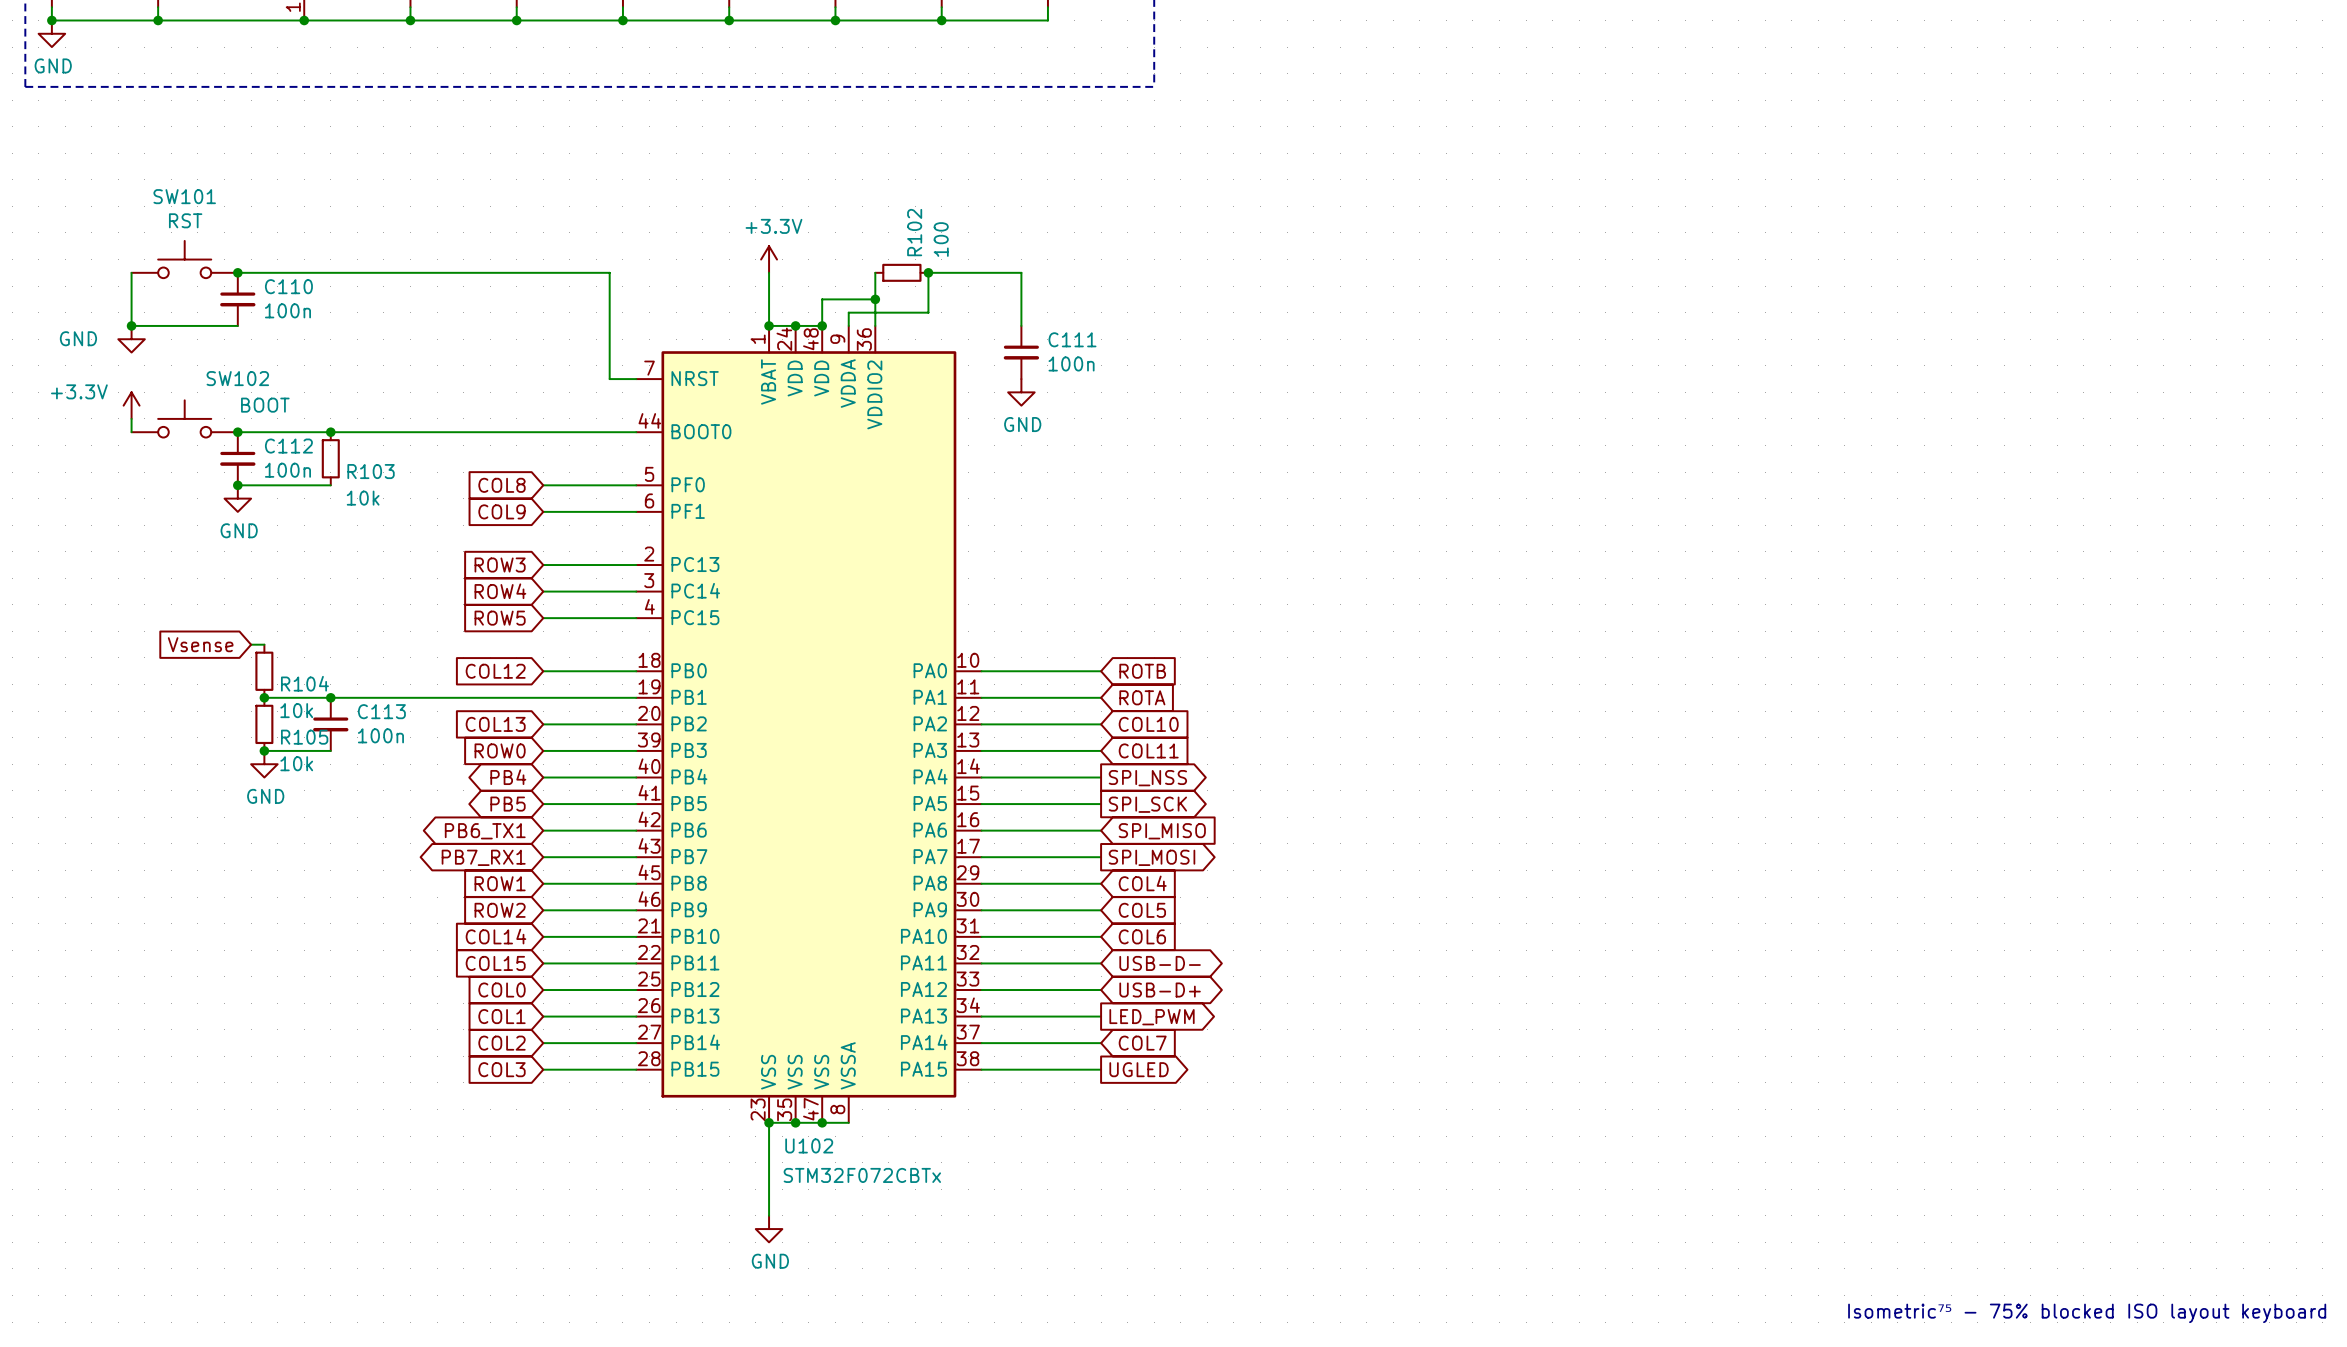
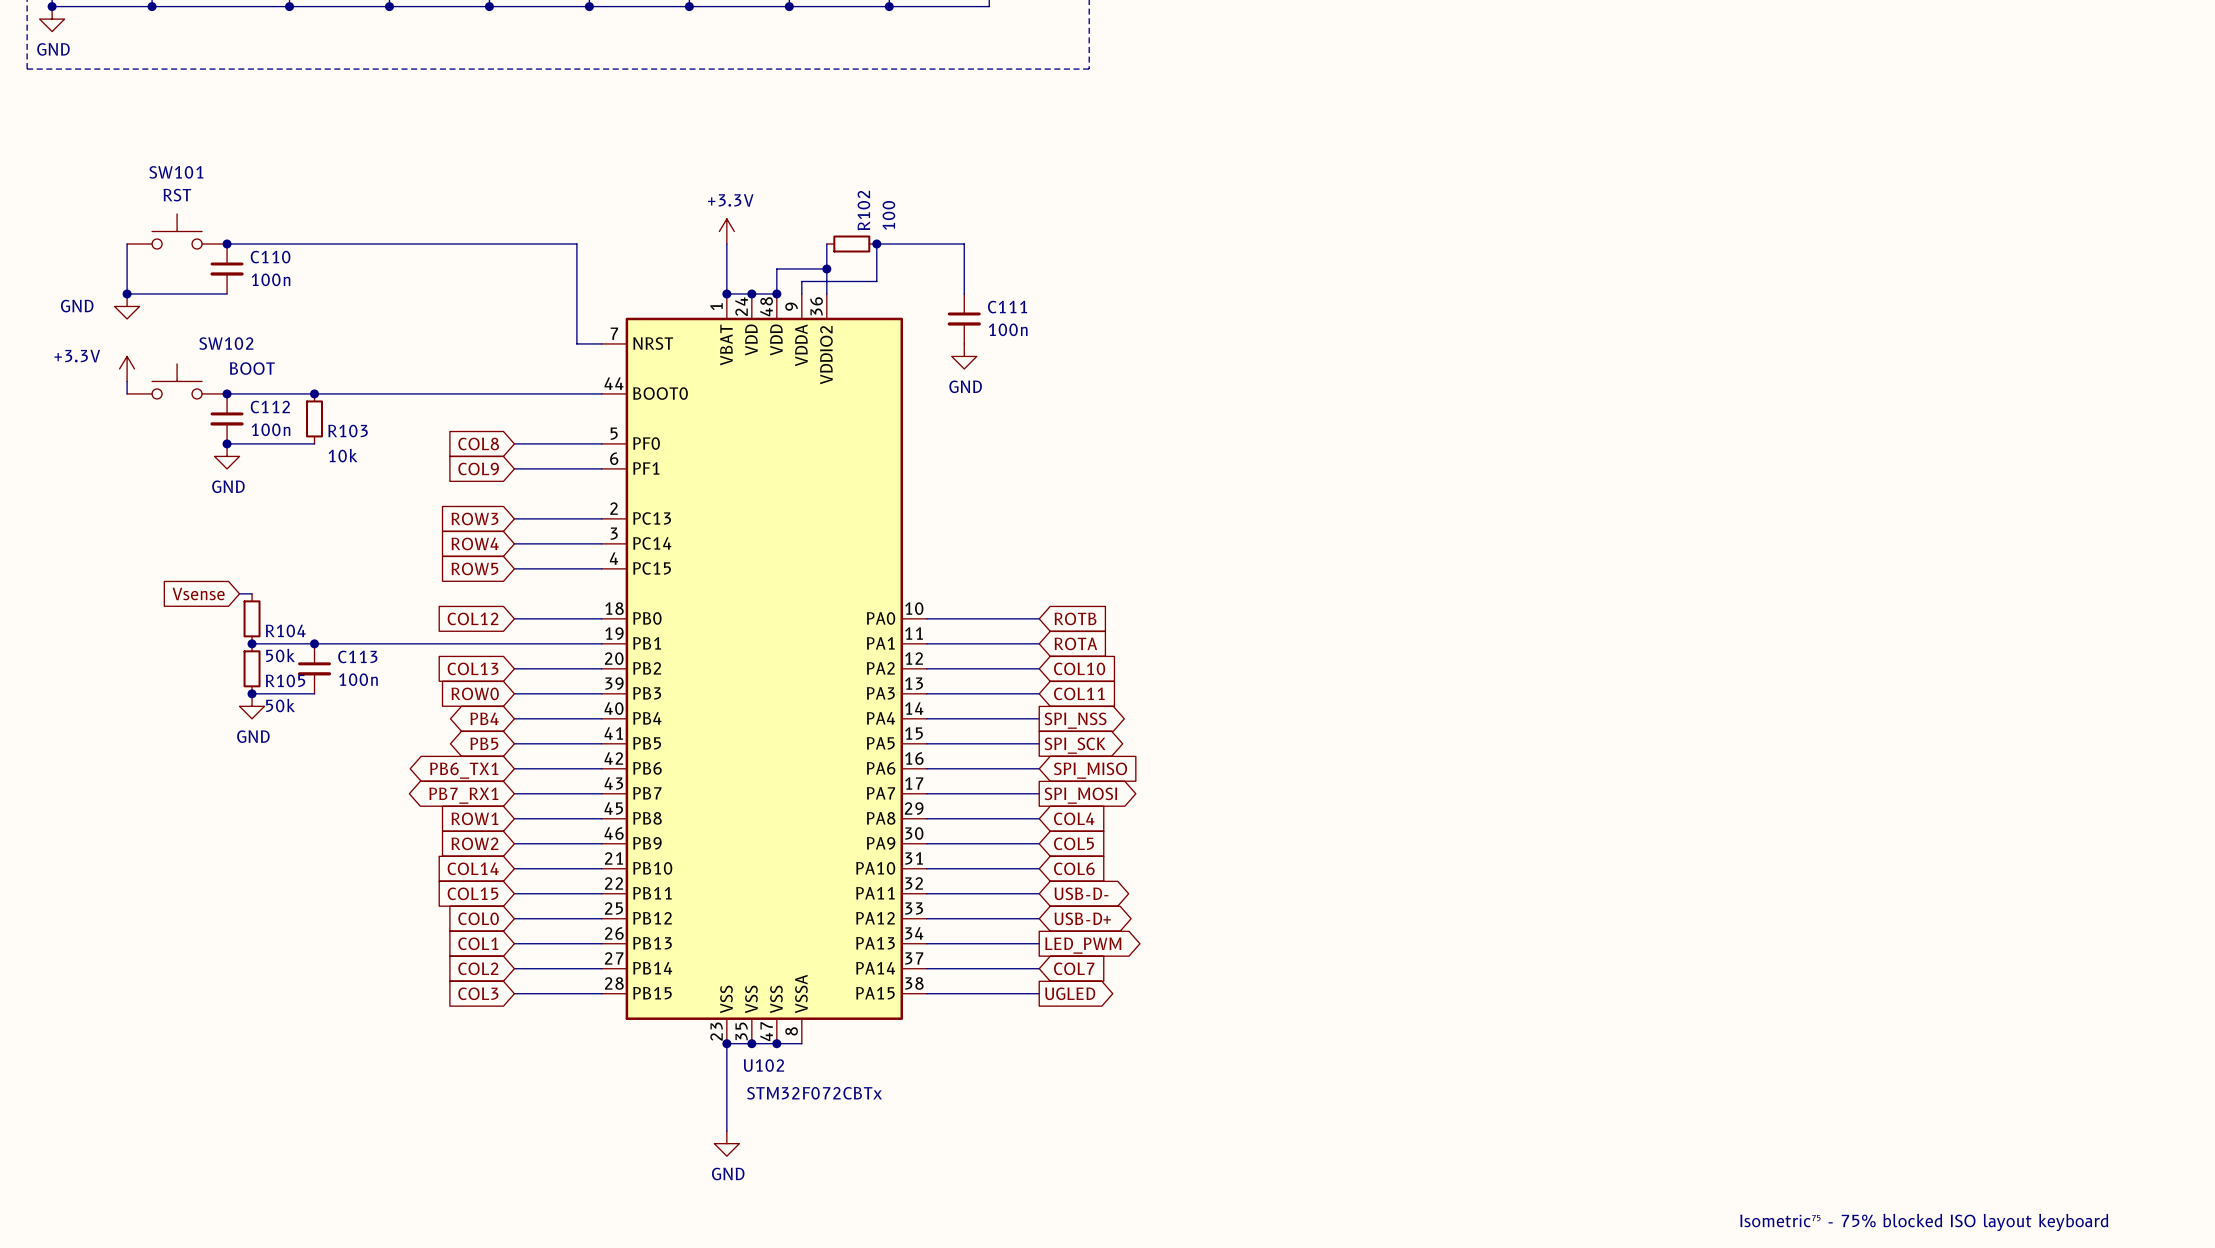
R104 value: 10k (296, 710) -> 50k (280, 655)
R105 value: 10k (296, 763) -> 50k (280, 705)

